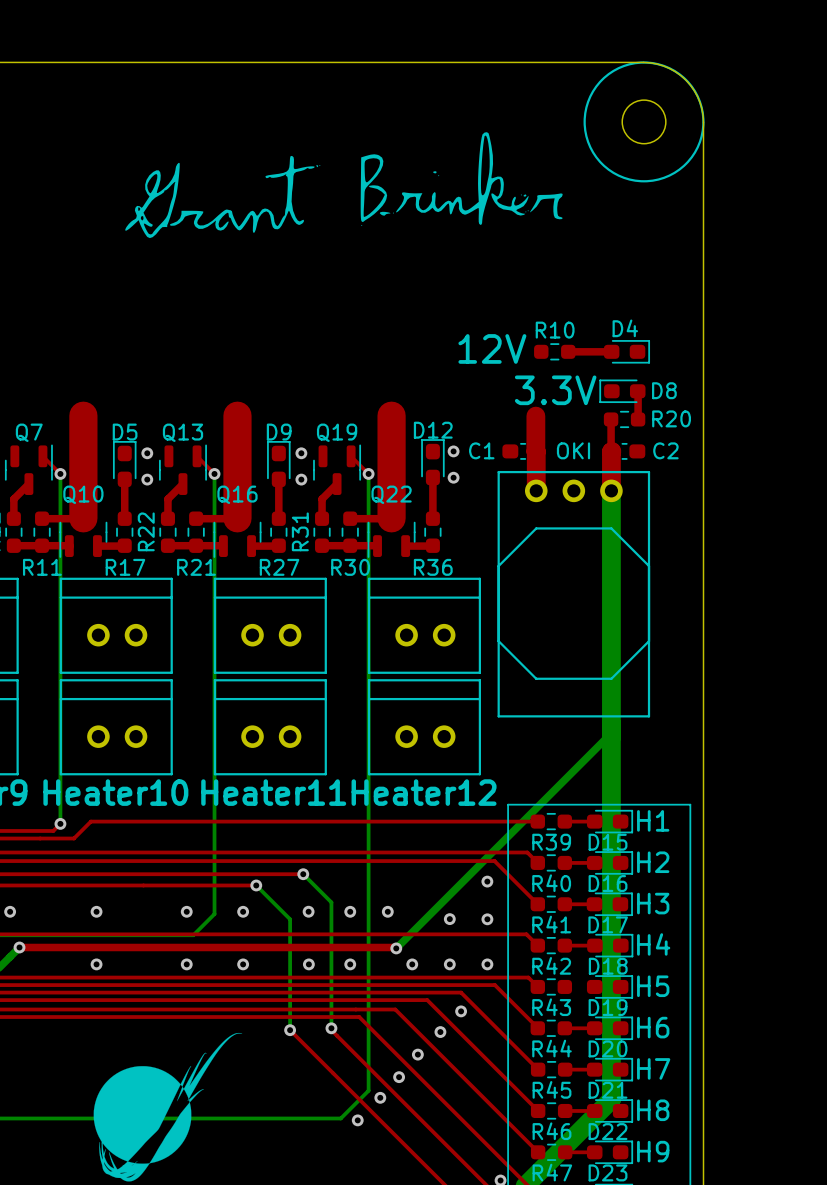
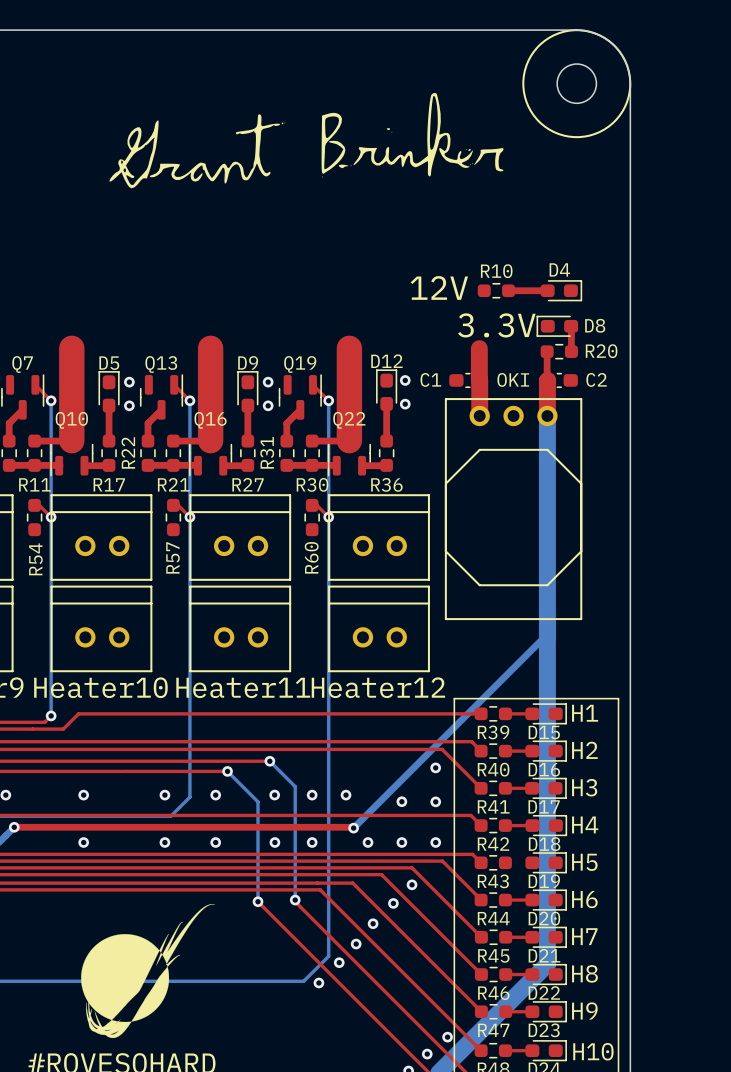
top track: none -> (34, 505) (39, 505) (51, 517)
top track: none -> (173, 505) (178, 505) (189, 517)
top track: none -> (312, 505) (316, 505) (328, 517)
R54: none -> (34, 517)
via: none -> (51, 517)
R57: none -> (173, 517)
via: none -> (189, 517)
R60: none -> (312, 517)
via: none -> (328, 517)

